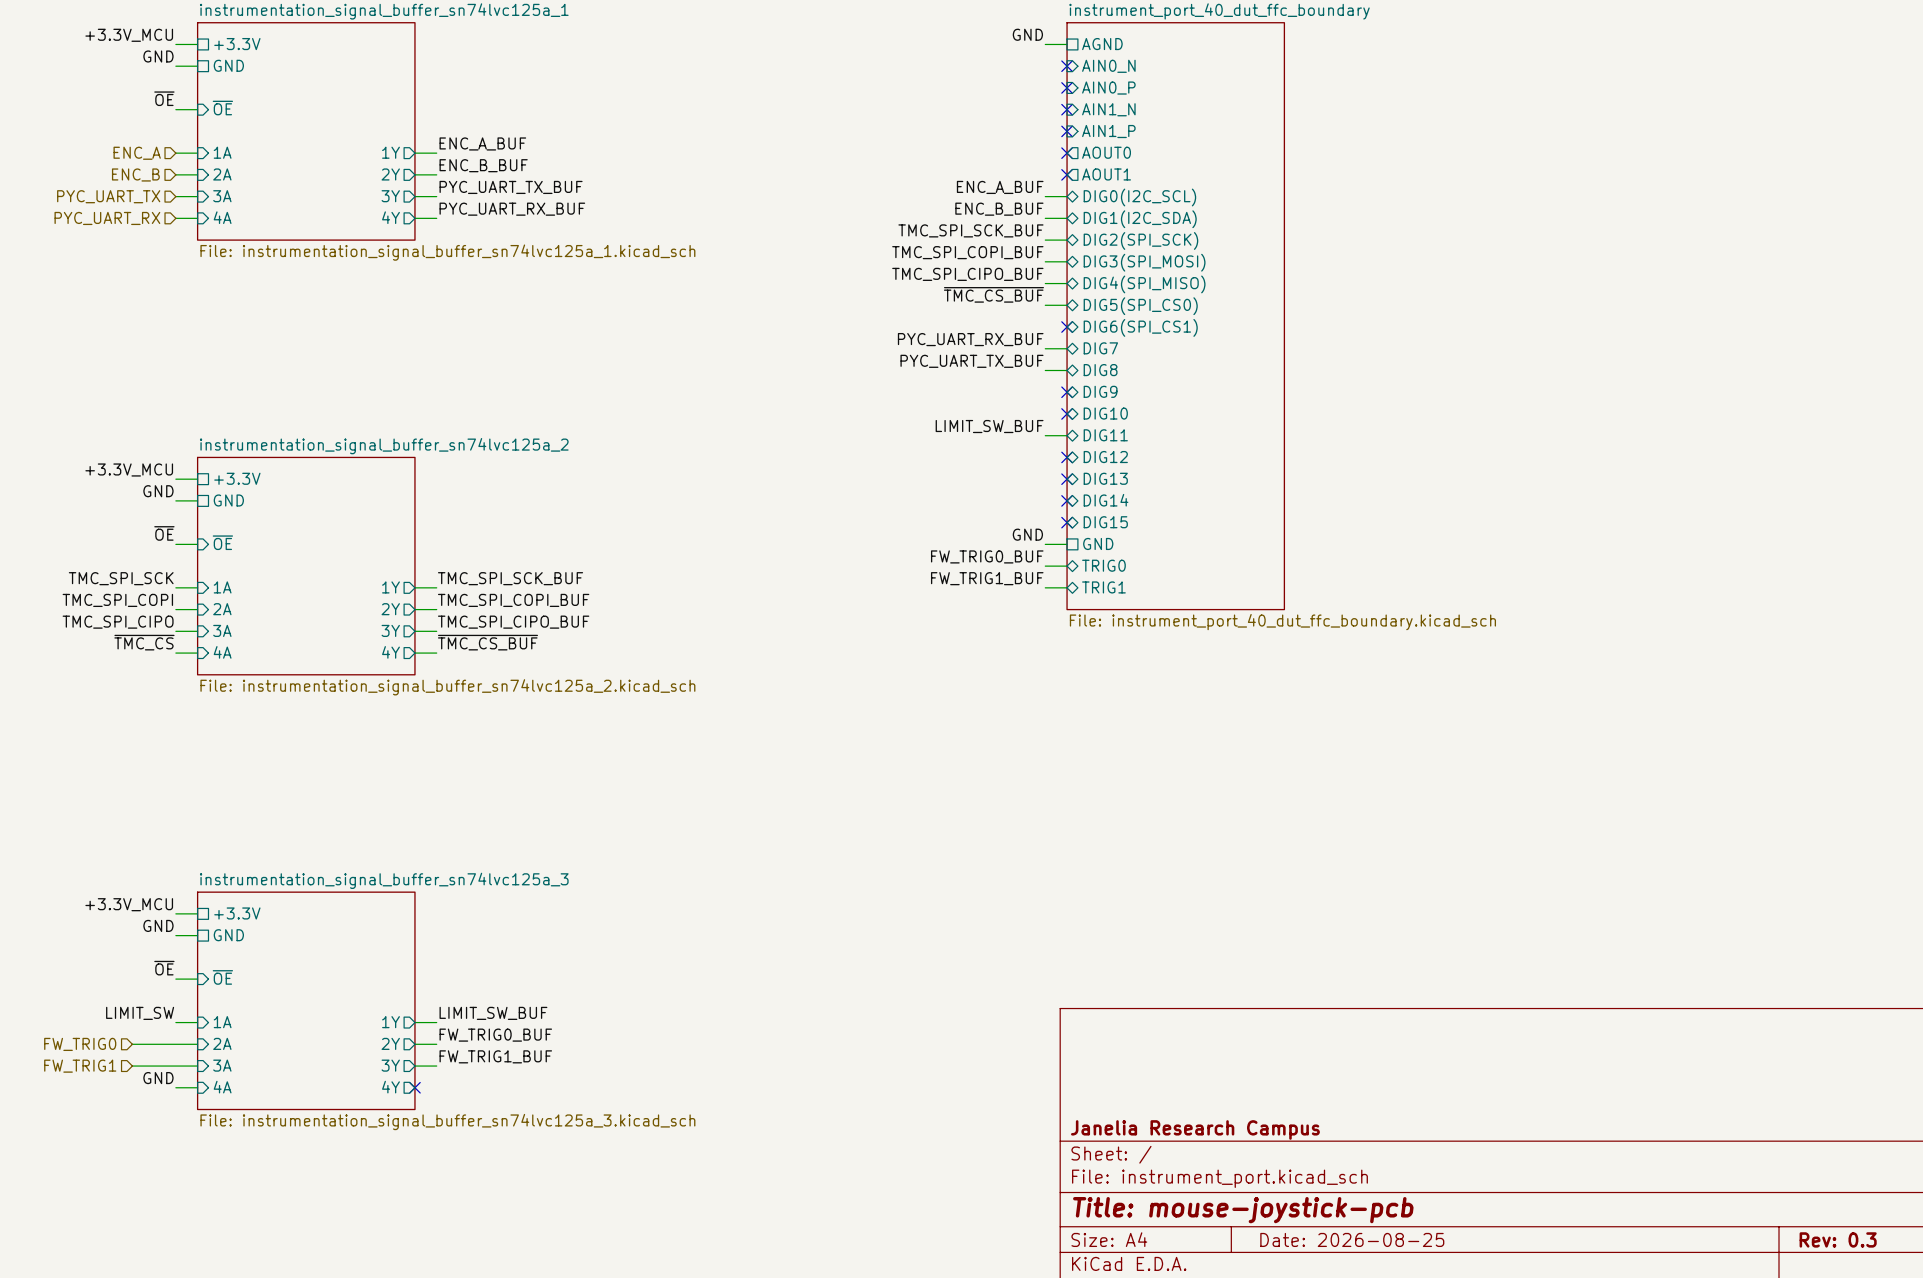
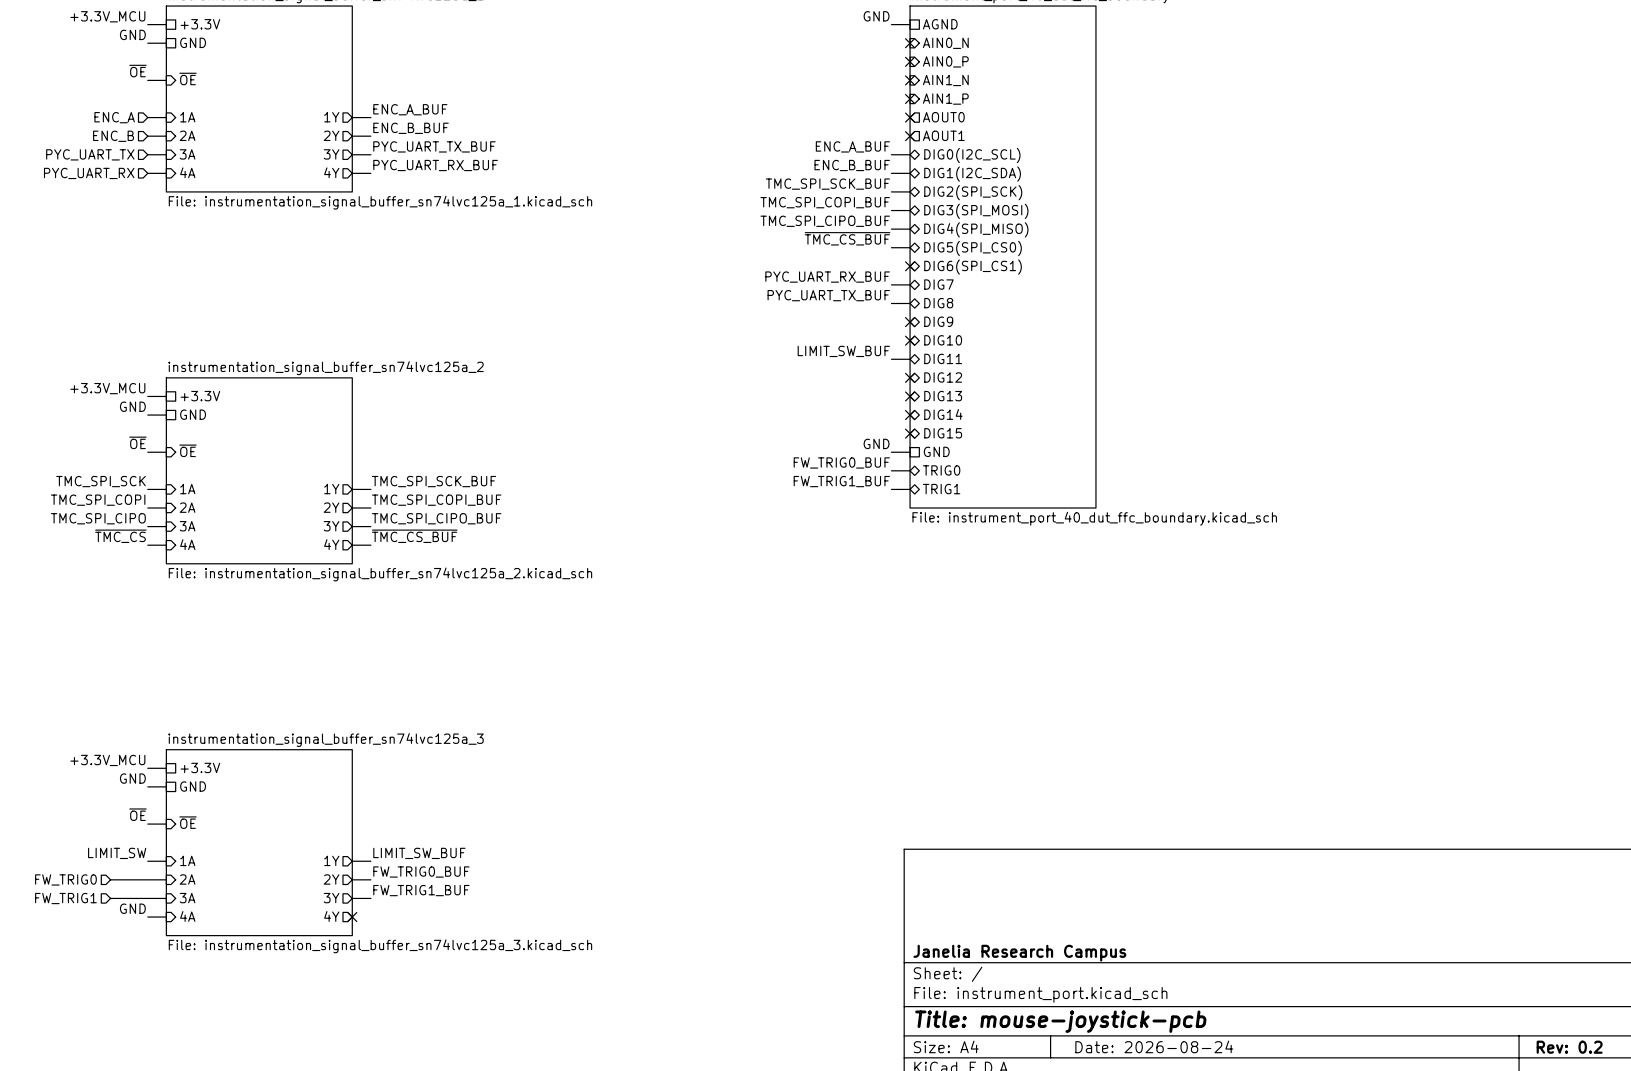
title block: Date: 2026-08-25 (1352, 1239) -> Date: 2026-08-24 (1154, 1046)
title block: Rev: 0.3 (1838, 1239) -> Rev: 0.2 (1569, 1047)

